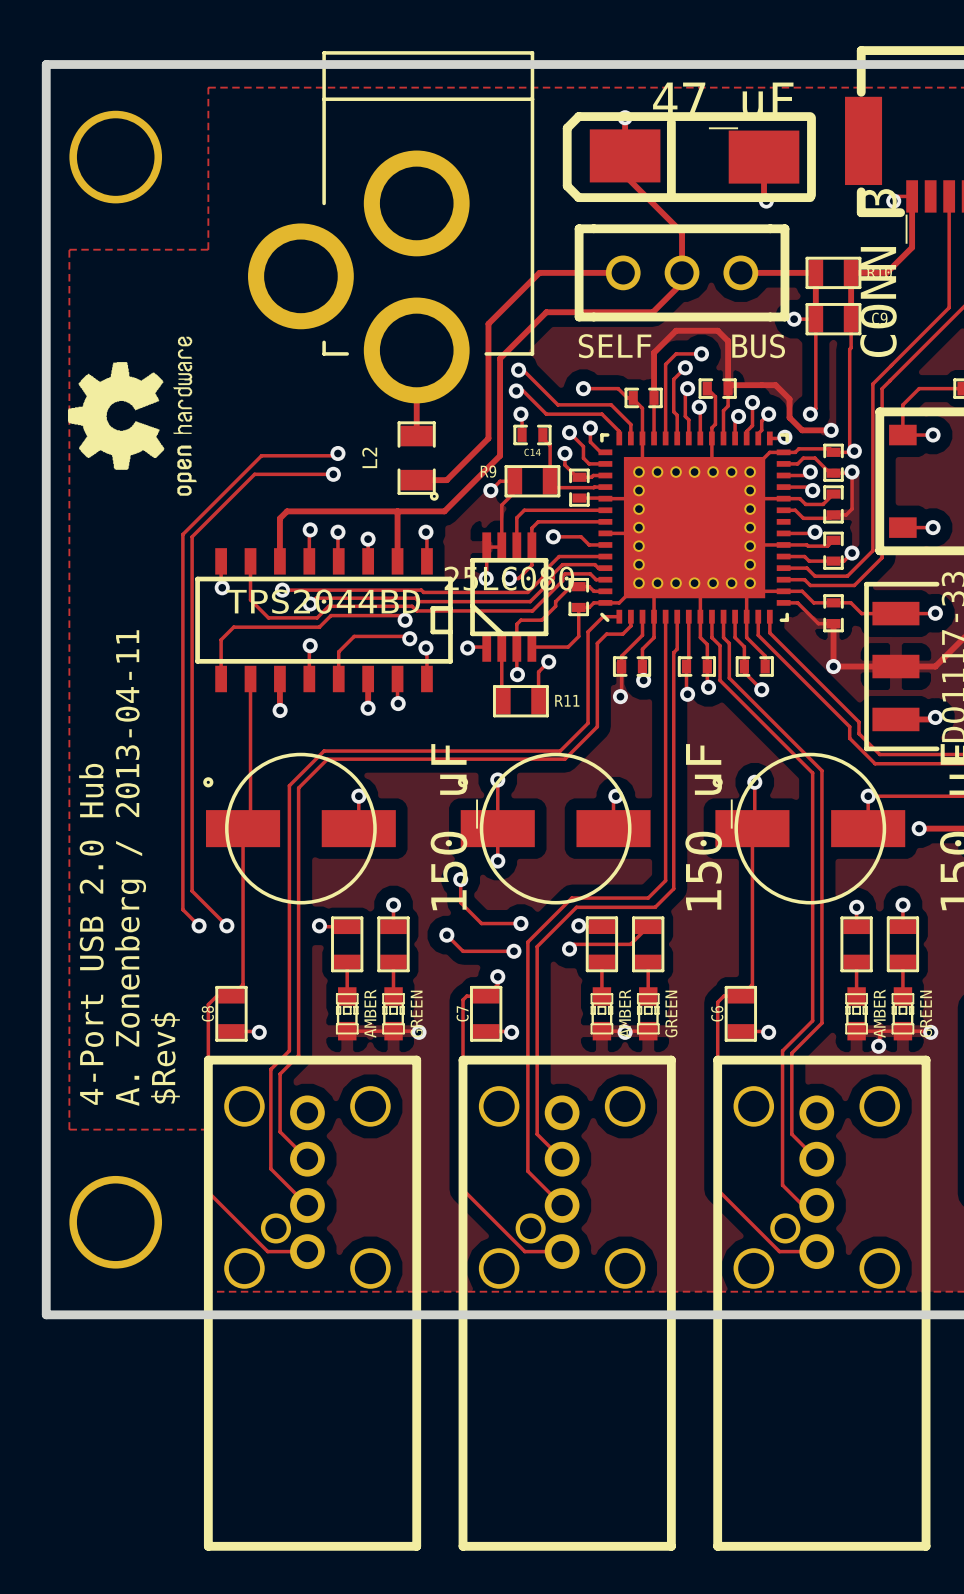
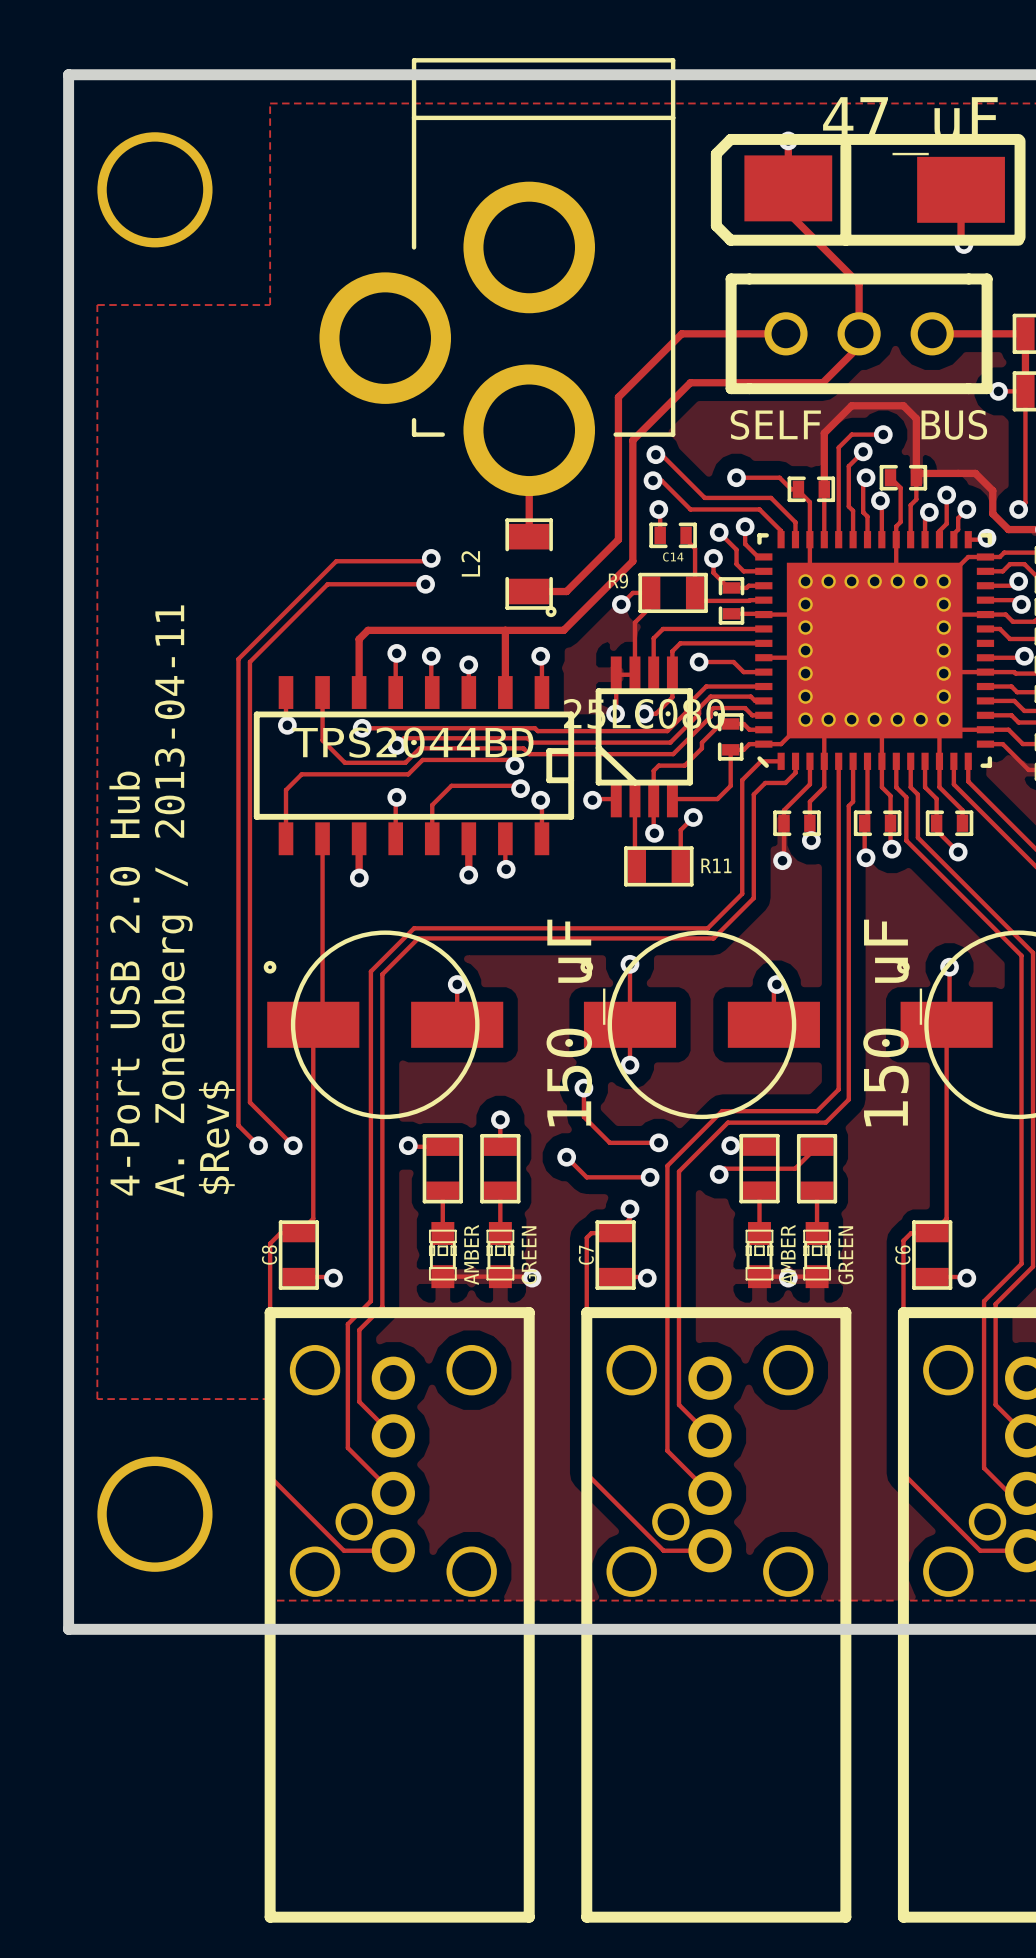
drawing: [67, 336, 197, 496] -> none
text position: A. Zonenberg / 2013-04-11 (130, 868) -> A. Zonenberg / 2013-04-11 (173, 901)
text position: 4-Port USB 2.0 Hub (91, 934) -> 4-Port USB 2.0 Hub (124, 983)
text position: $Rev$ (165, 1058) -> $Rev$ (216, 1137)

